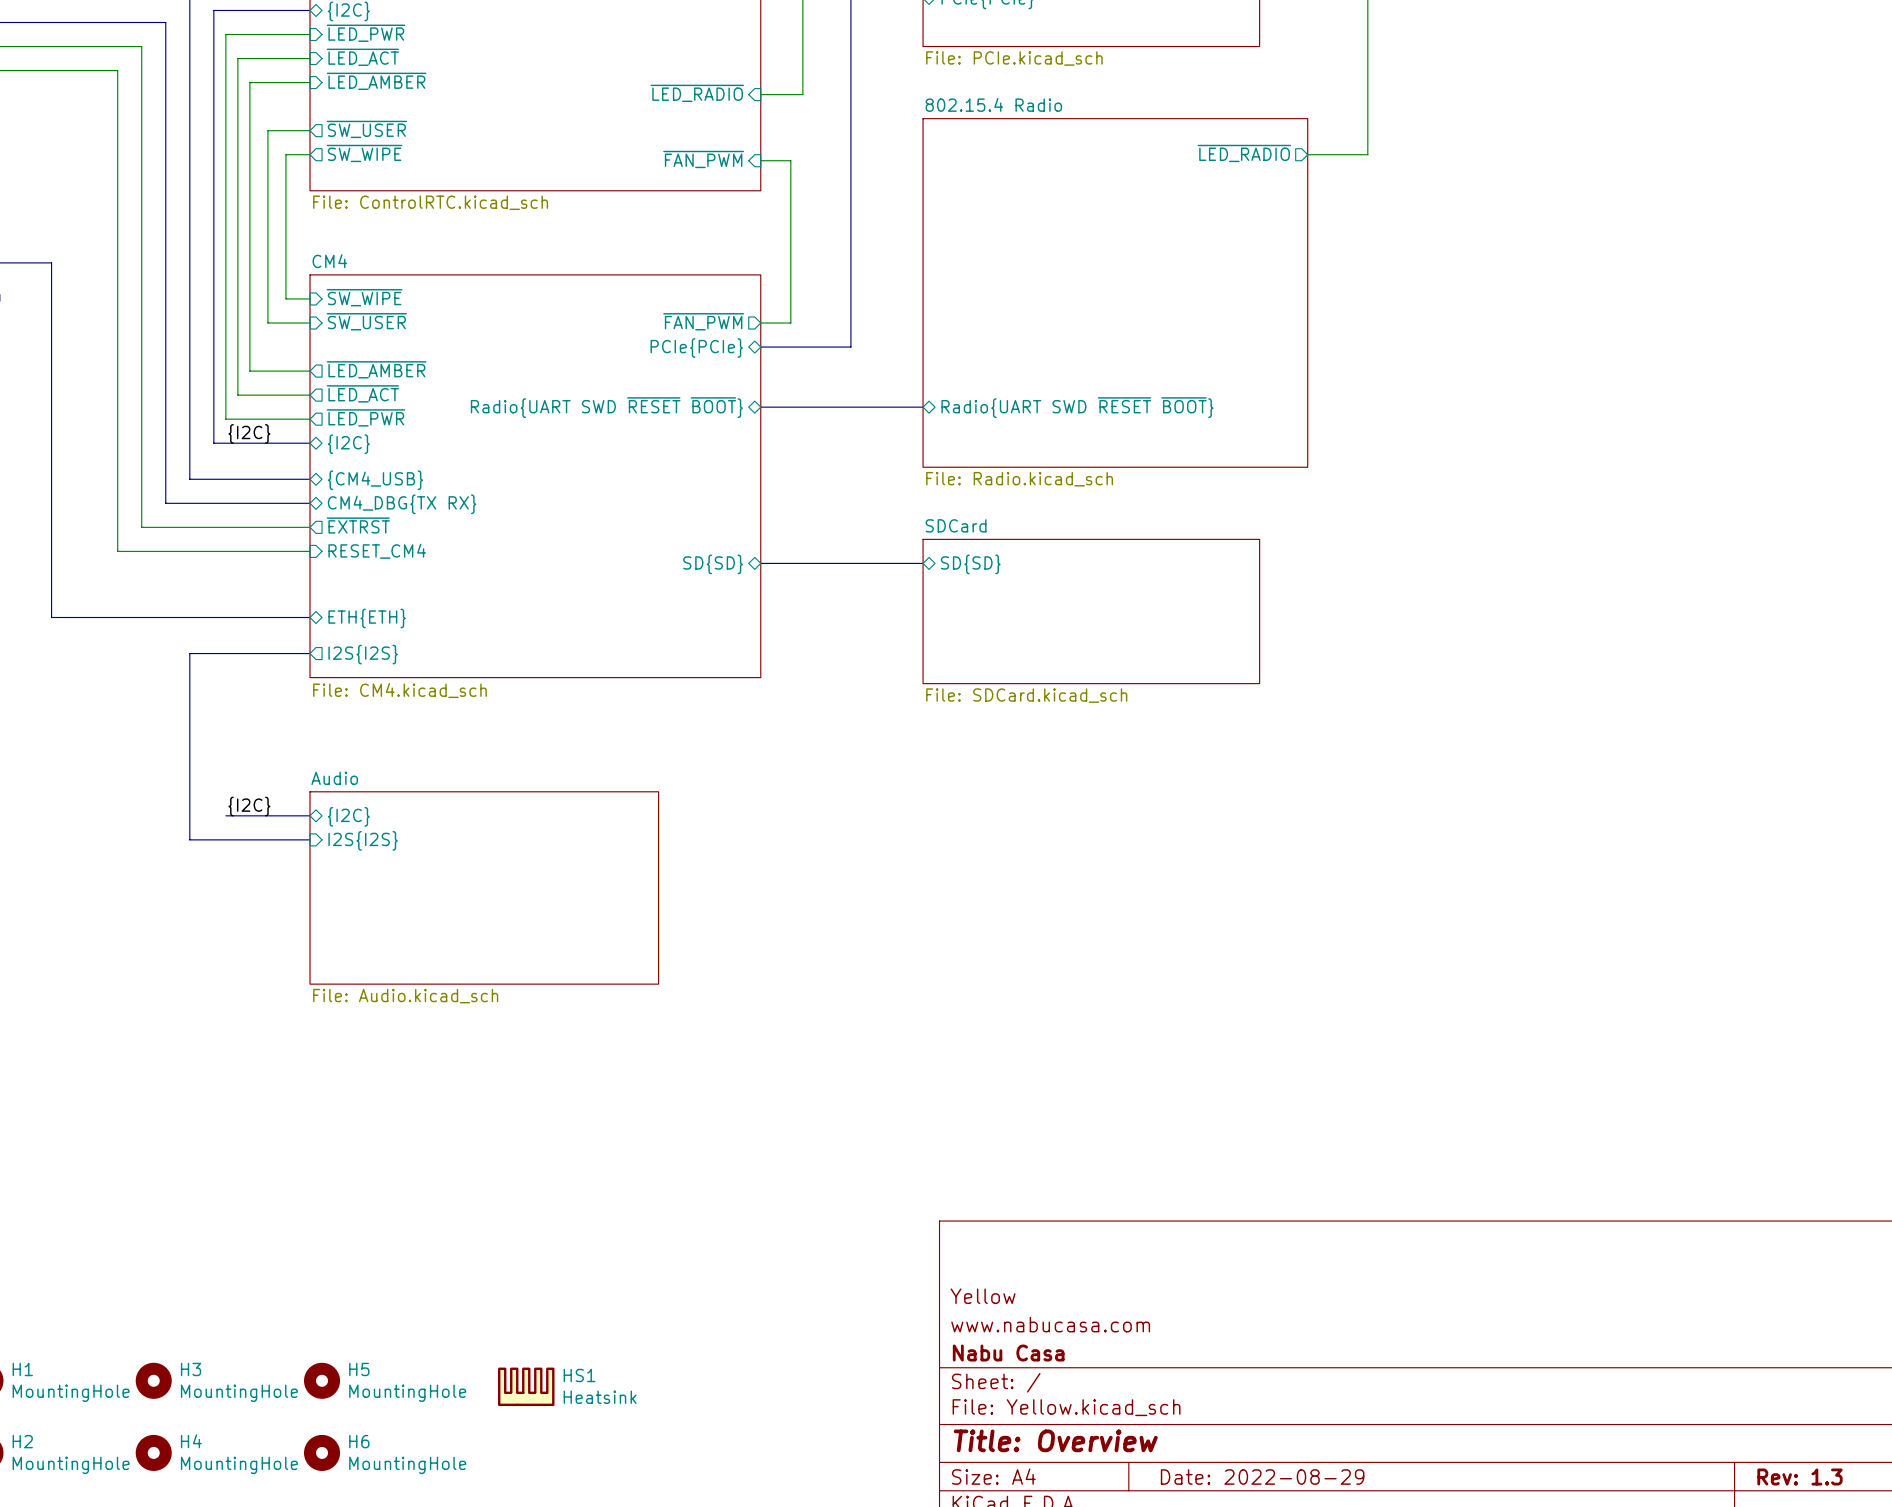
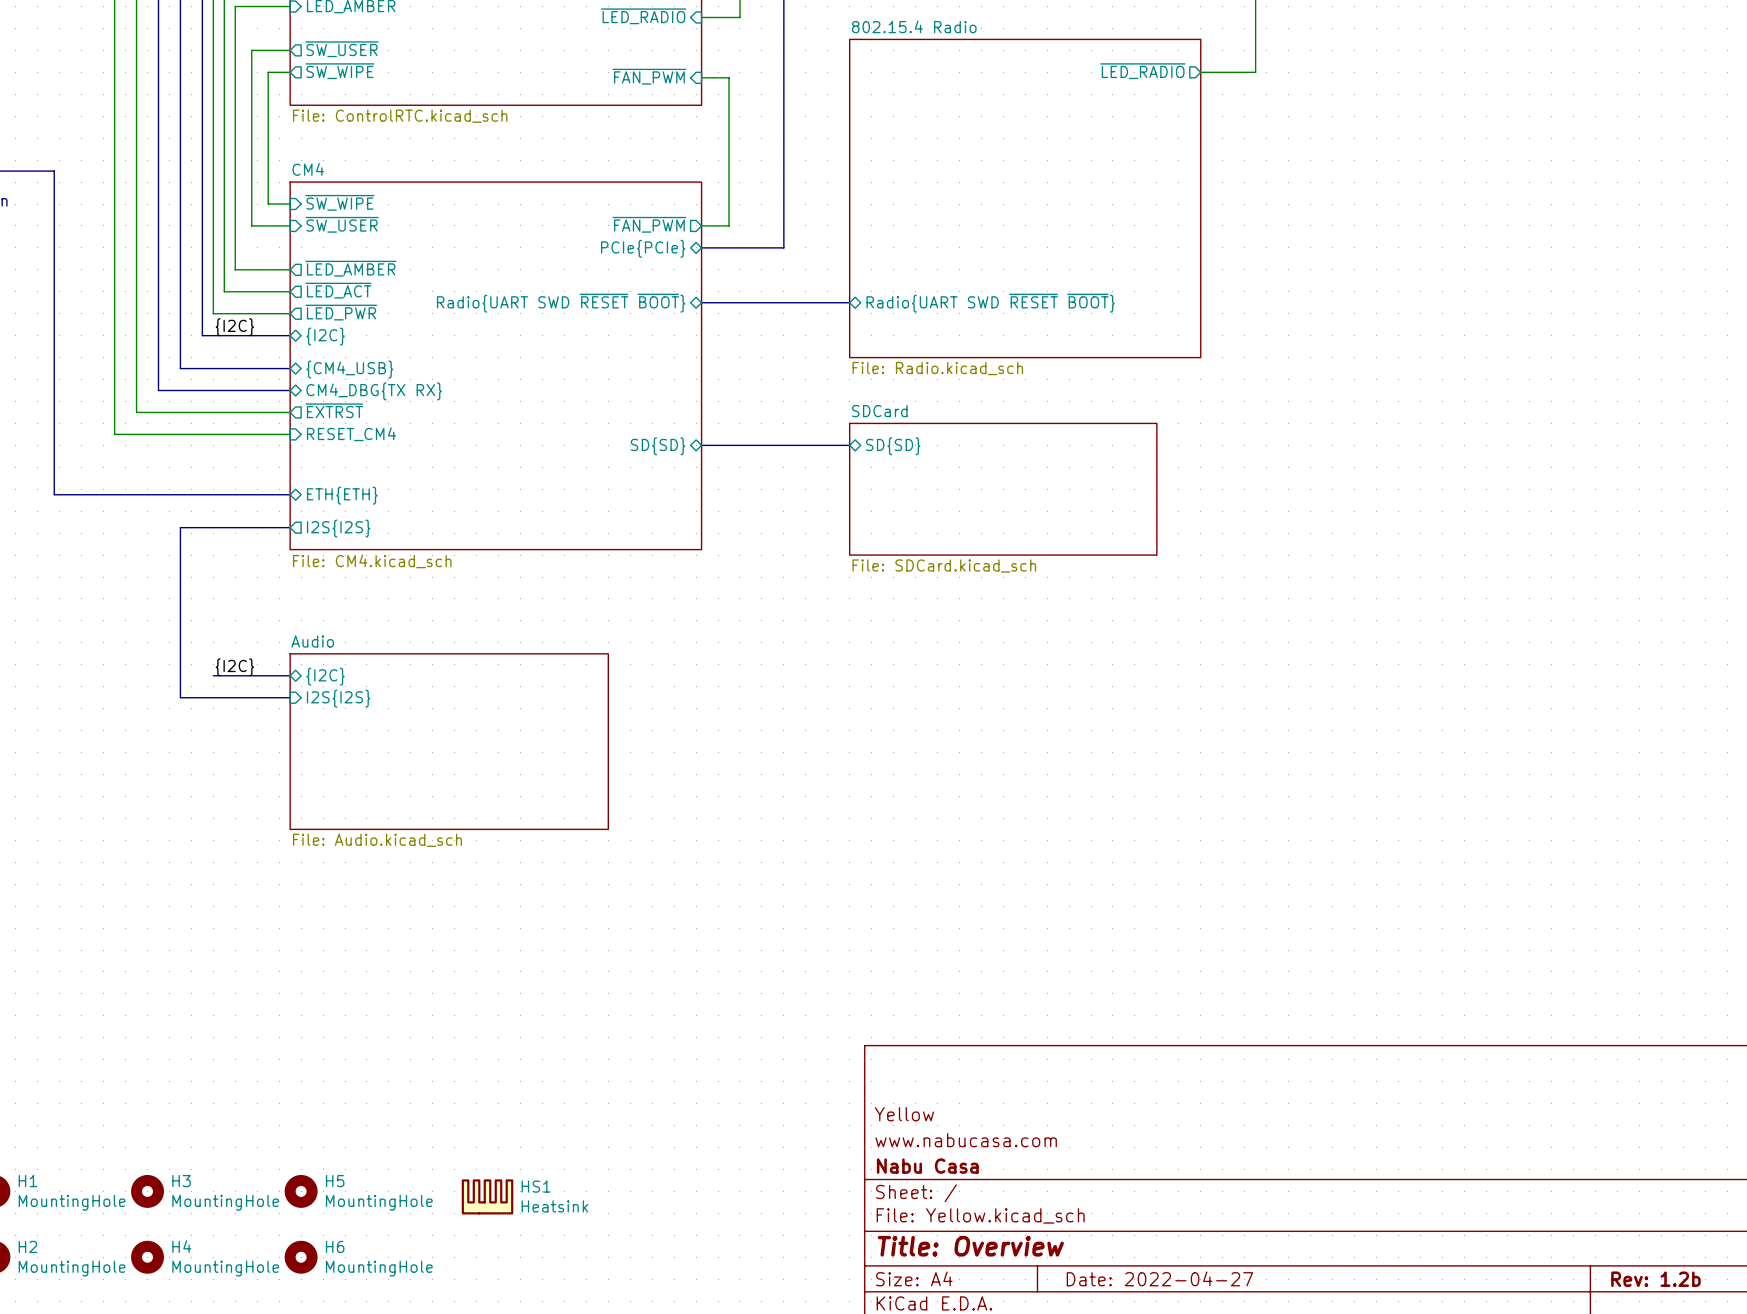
title block: Date: 2022-08-29 (1262, 1477) -> Date: 2022-04-27 (1159, 1278)
title block: Rev: 1.3 (1799, 1477) -> Rev: 1.2b (1655, 1279)

